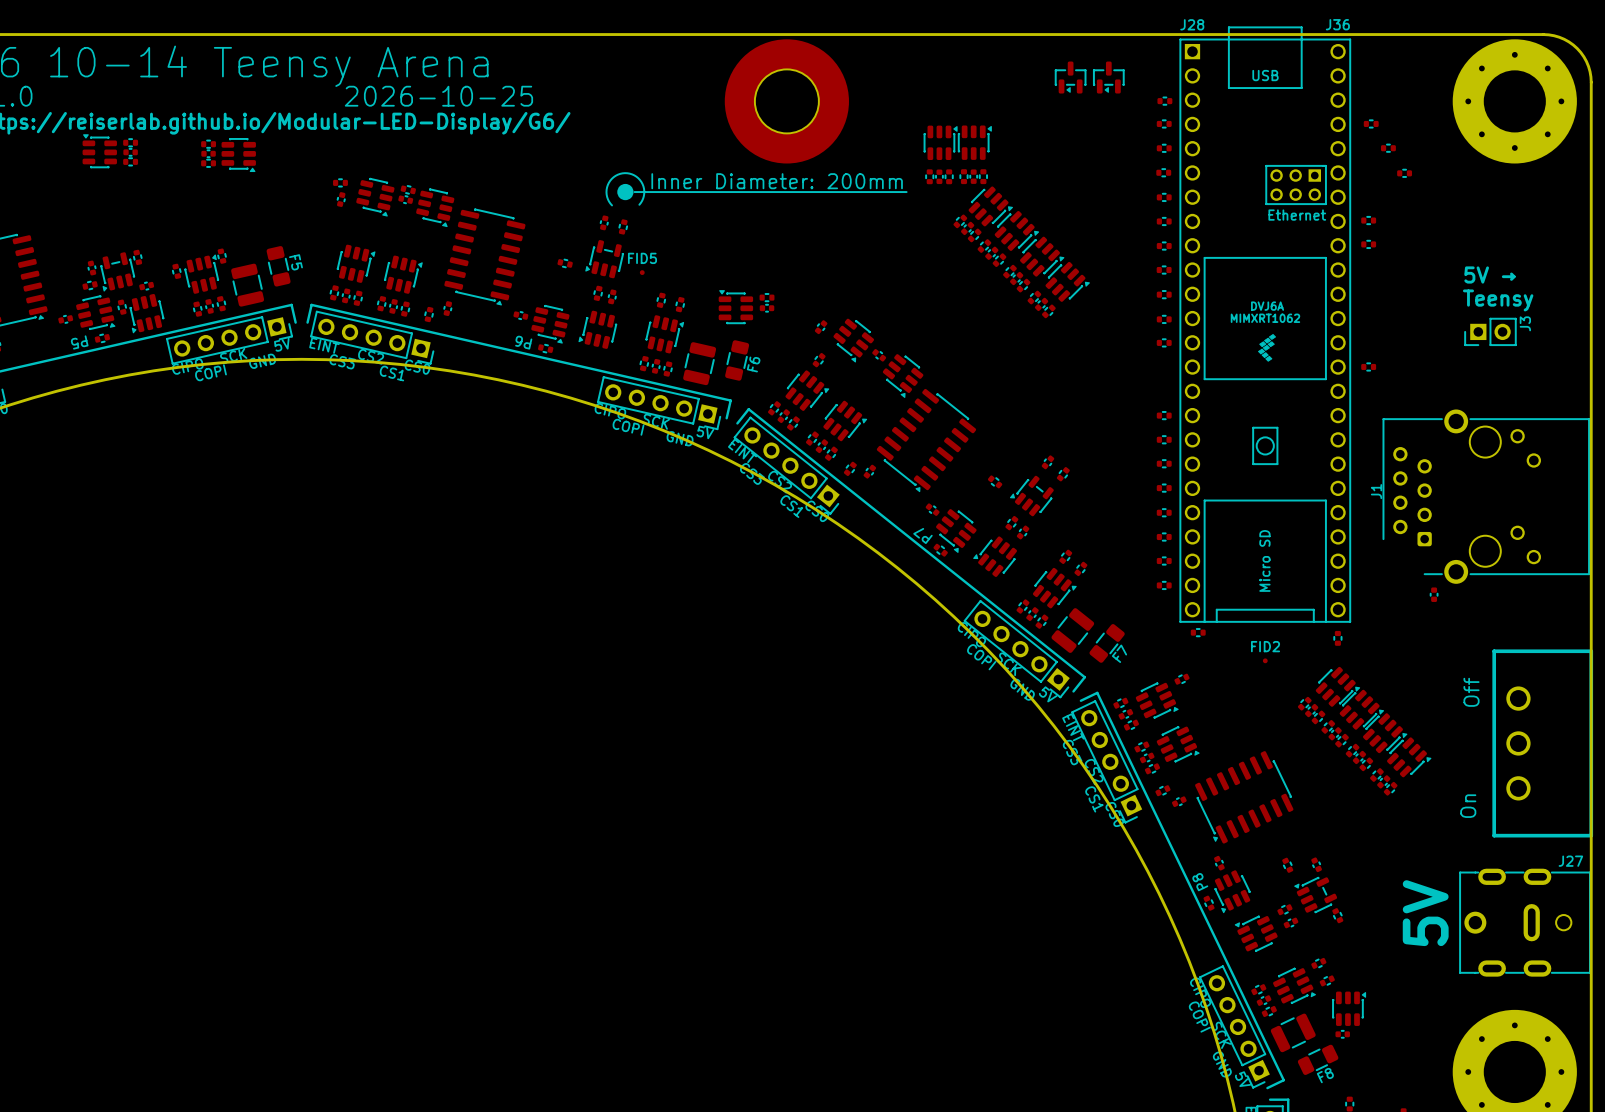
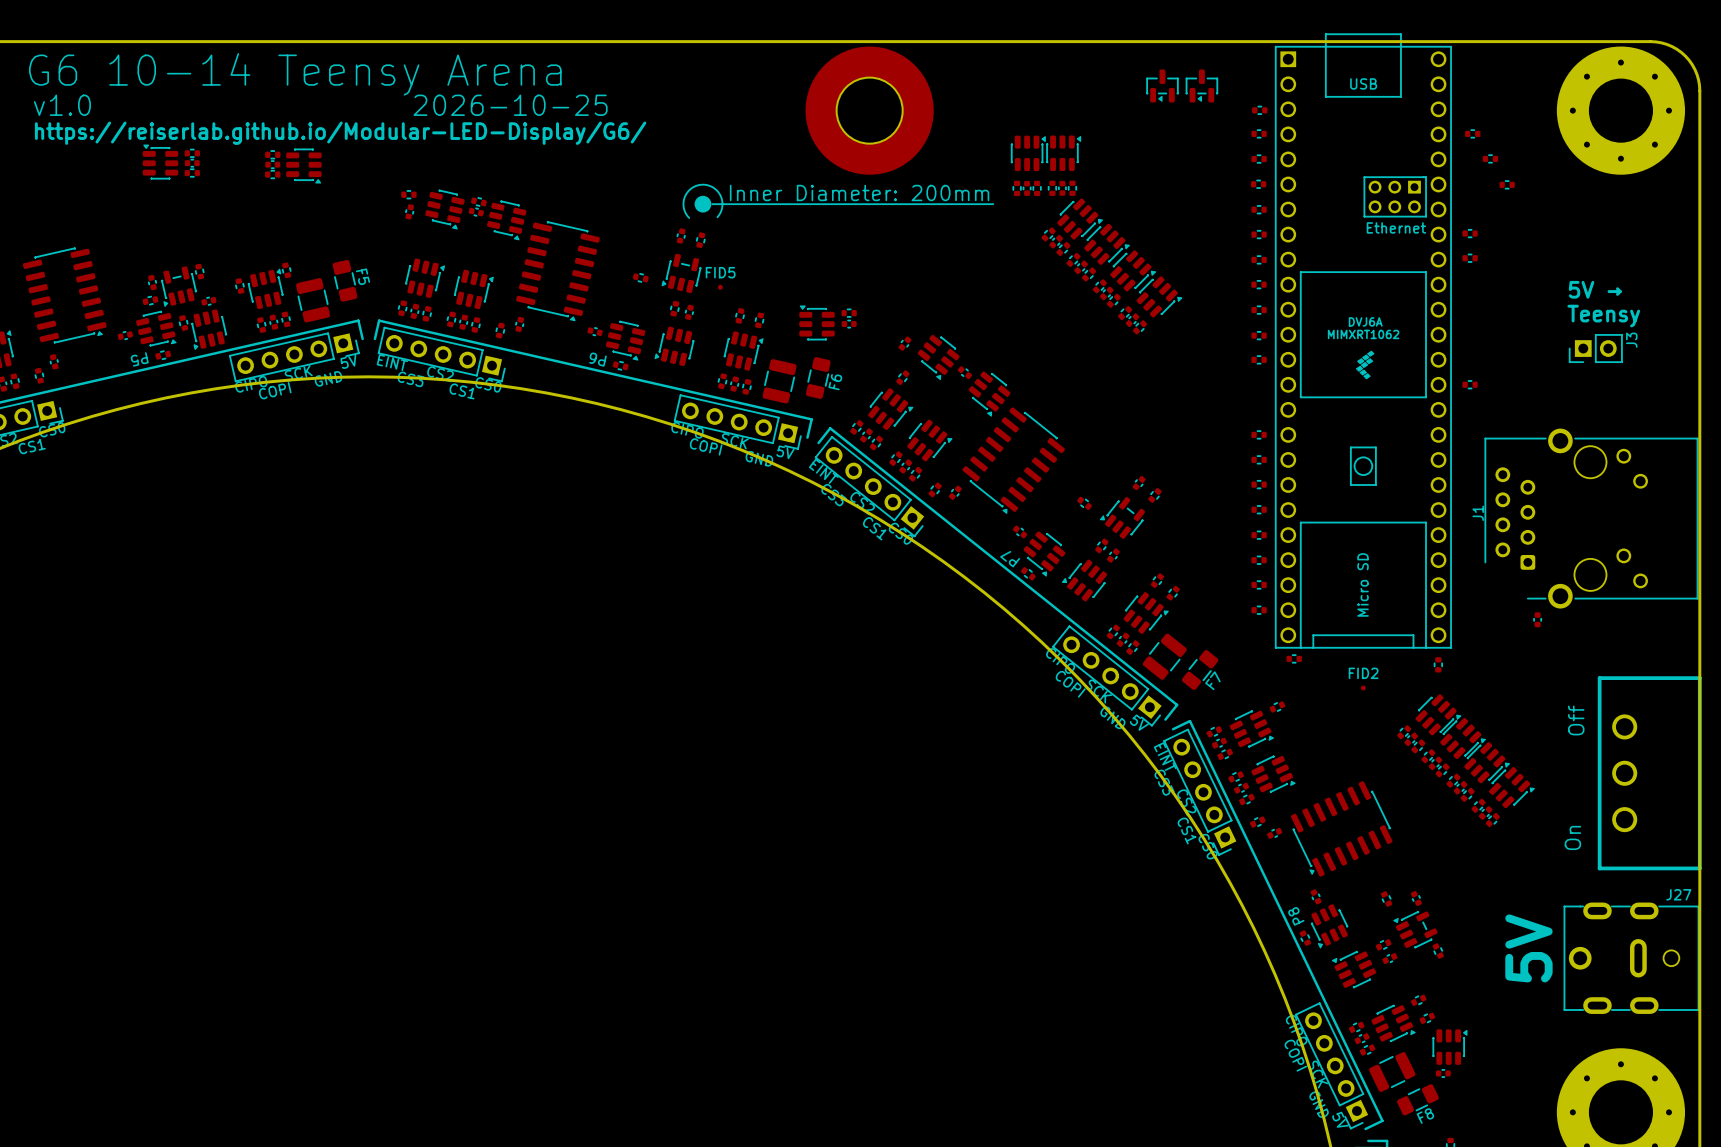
J28: (1192, 24) -> none
J36: (1337, 24) -> none

